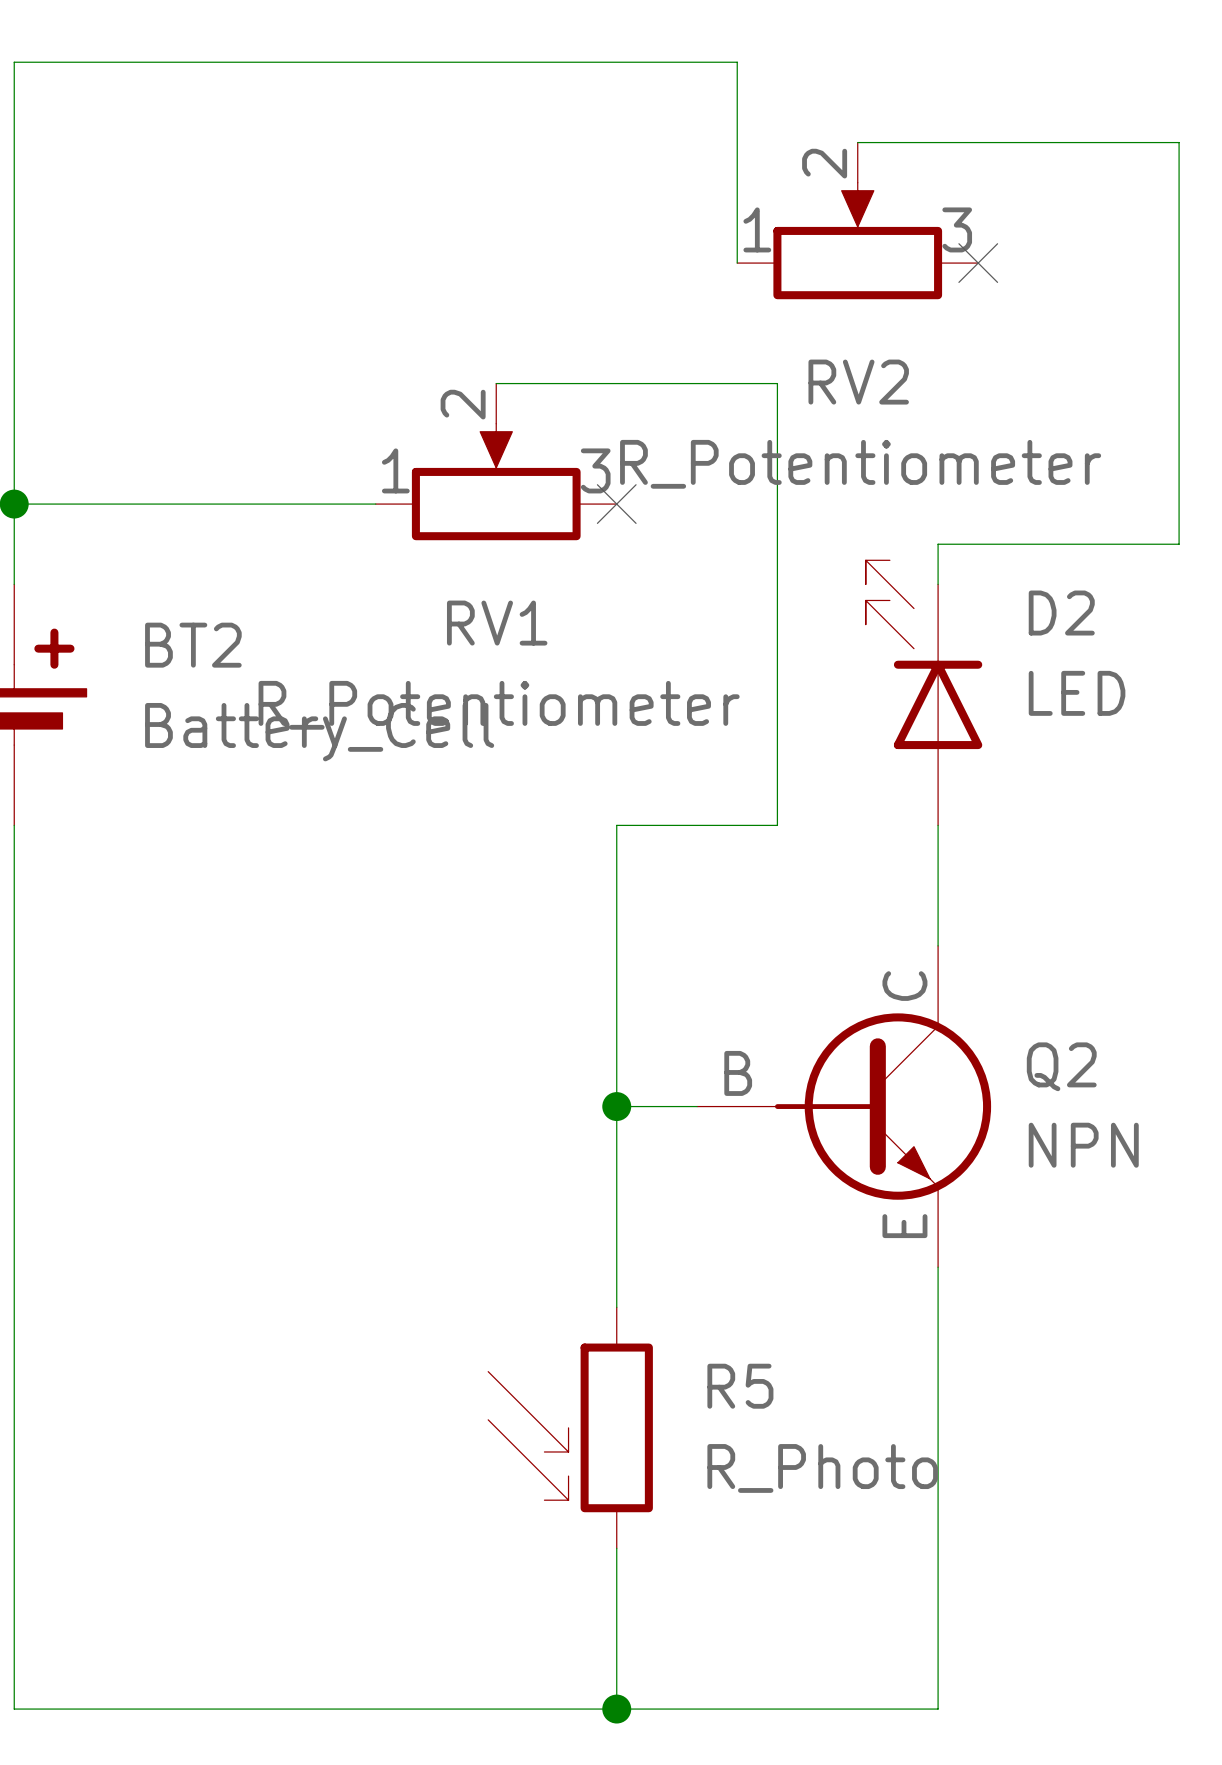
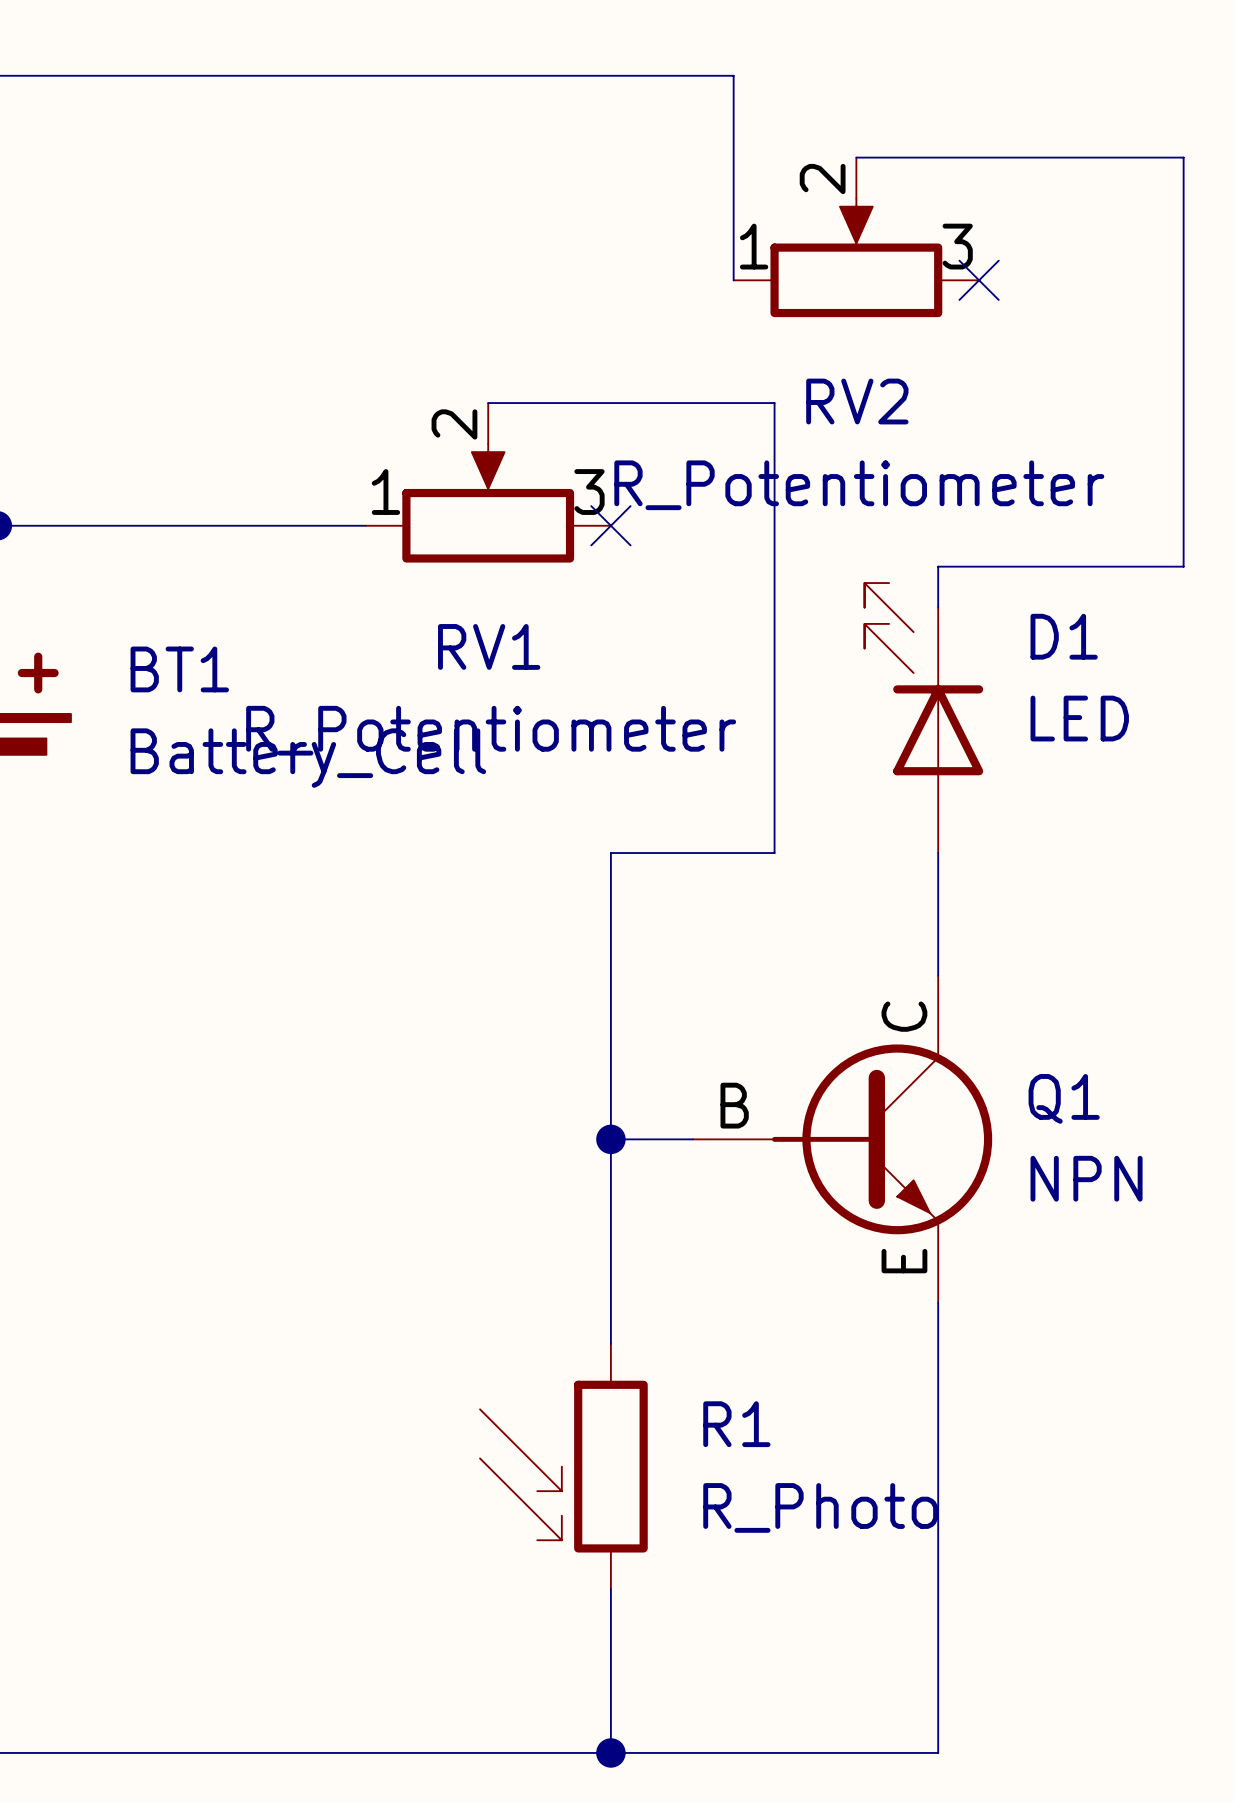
D2 name: D2 (1061, 613) -> D1 (1064, 636)
BT2 name: BT2 (193, 645) -> BT1 (179, 669)
Q2 name: Q2 (1061, 1066) -> Q1 (1064, 1098)
R5 name: R5 (740, 1386) -> R1 (736, 1424)

